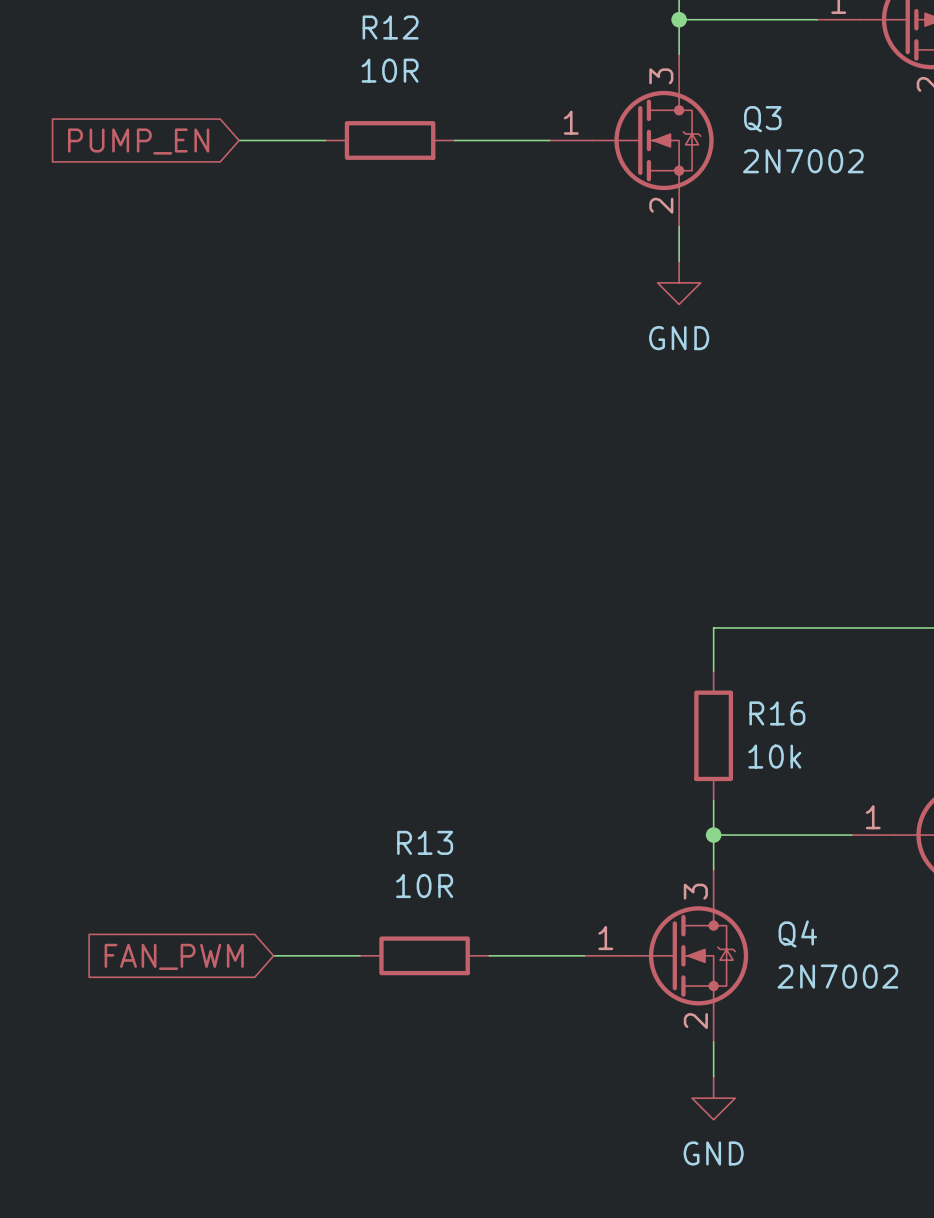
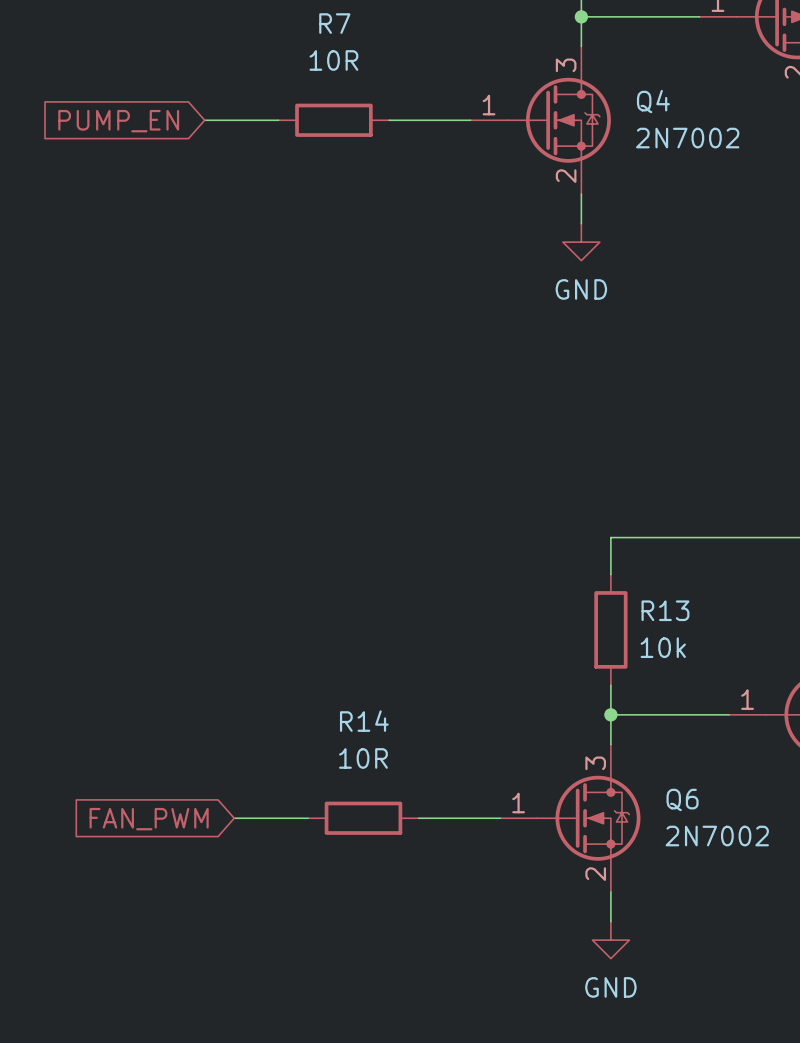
R12 name: R12 (390, 27) -> R7 (334, 23)
Q3 name: Q3 (762, 119) -> Q4 (653, 101)
R16 name: R16 (777, 713) -> R13 (665, 610)
R13 name: R13 (425, 842) -> R14 (364, 721)
Q4 name: Q4 (797, 933) -> Q6 (682, 799)

